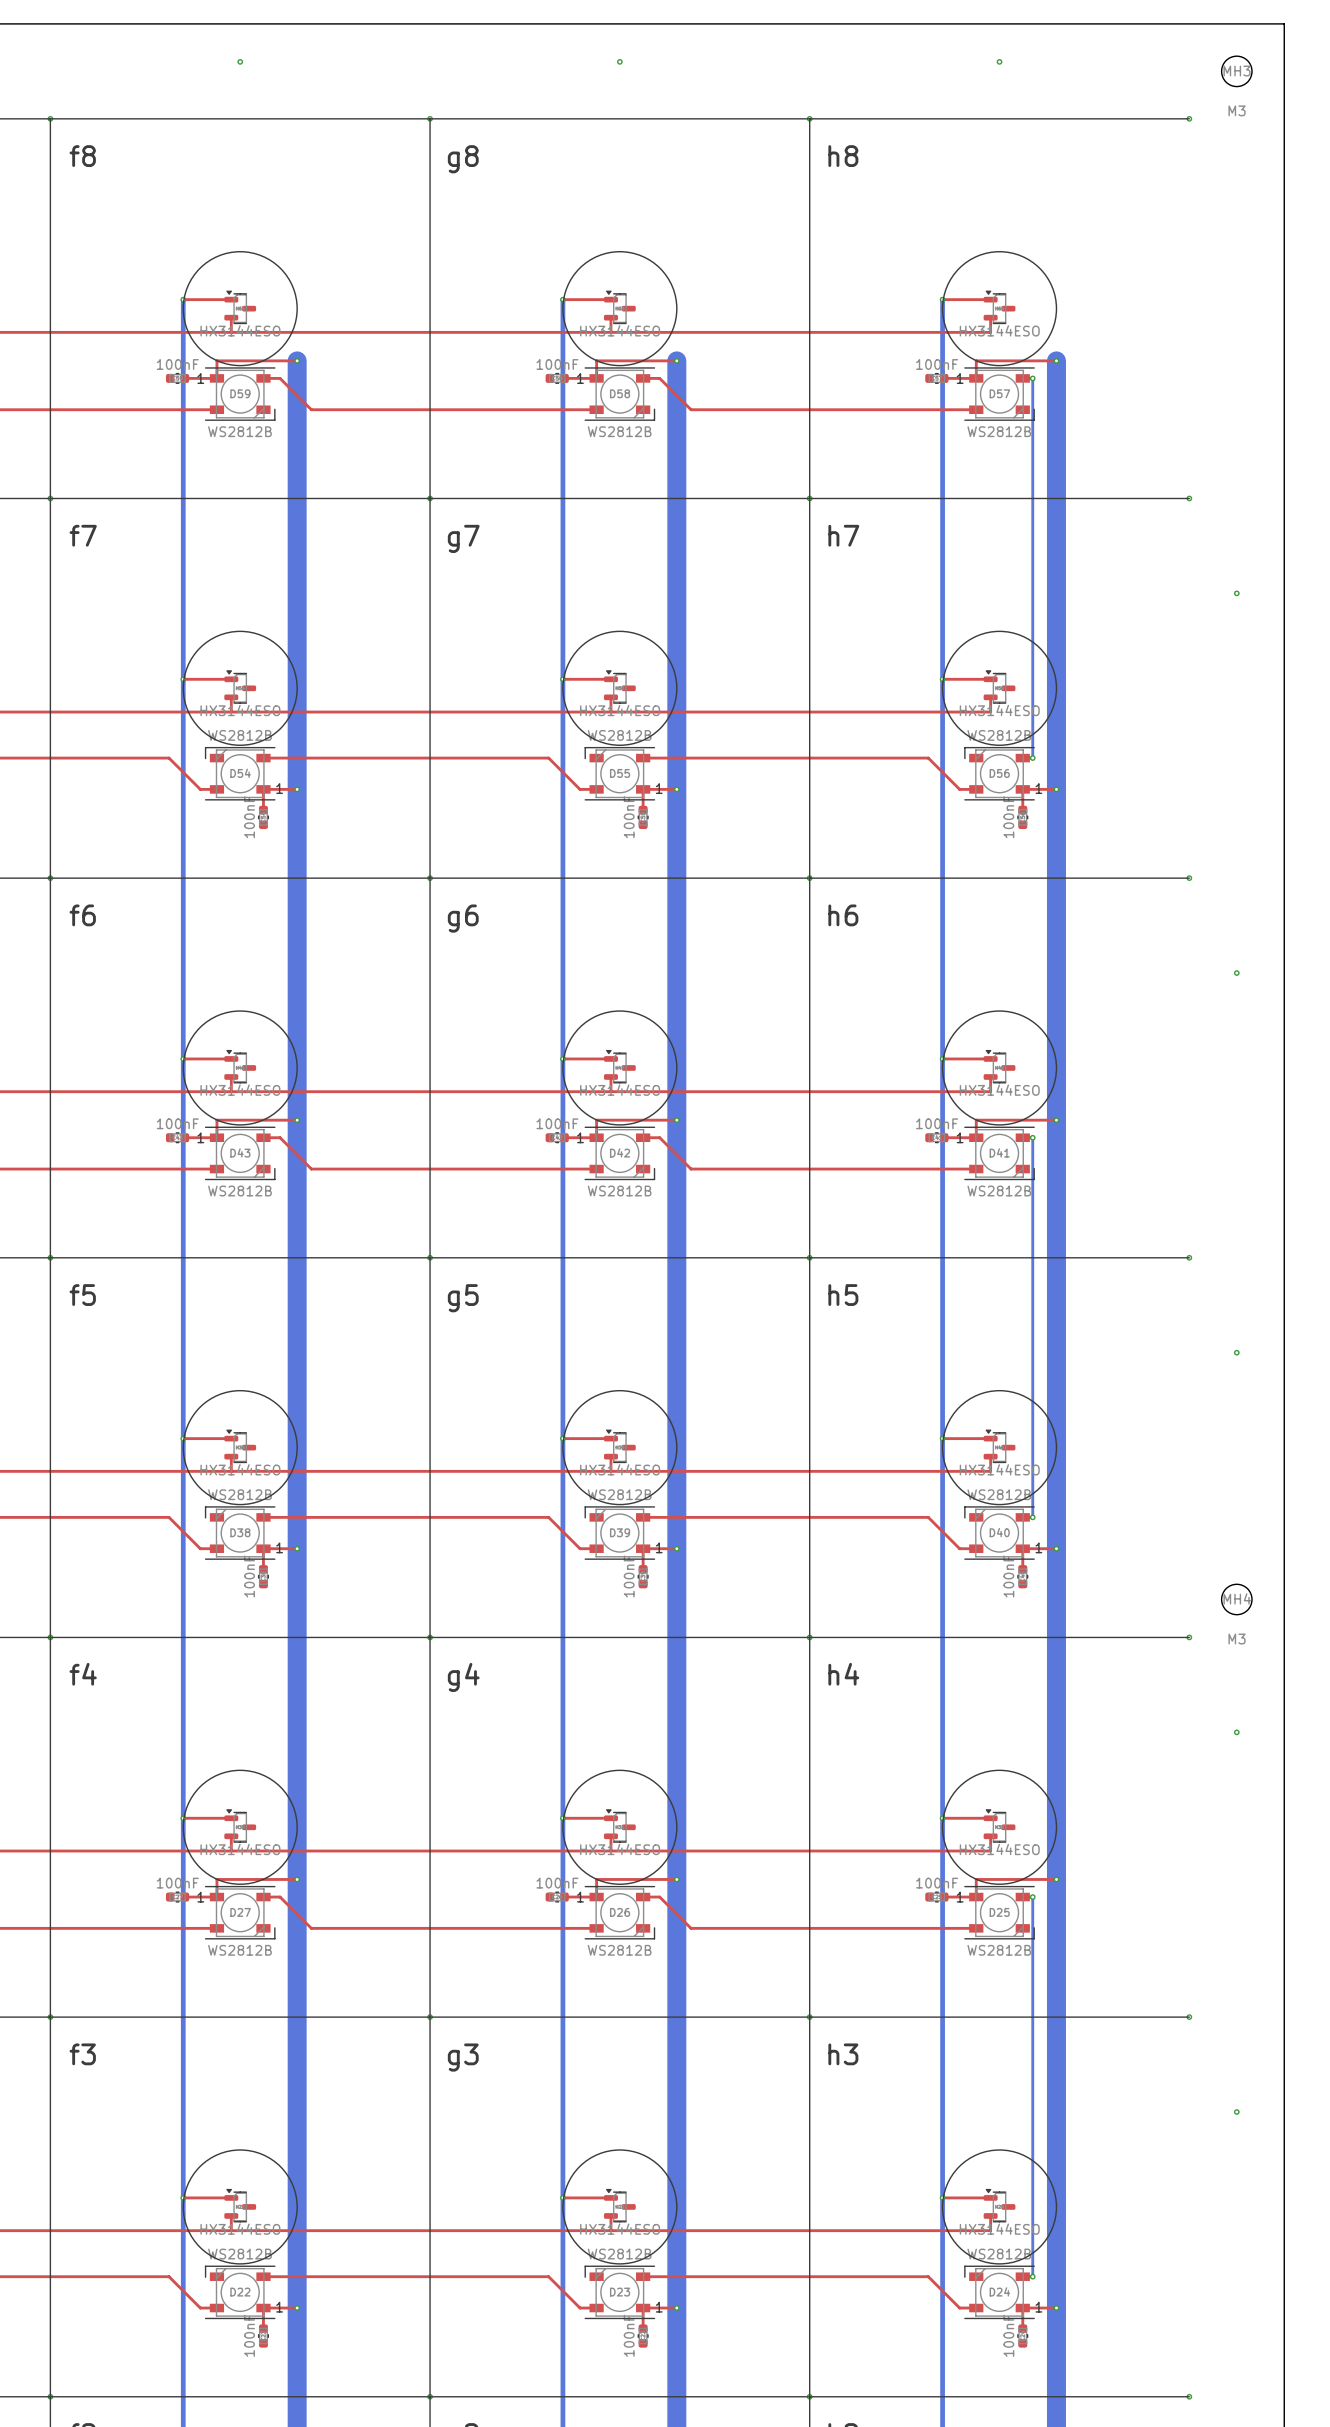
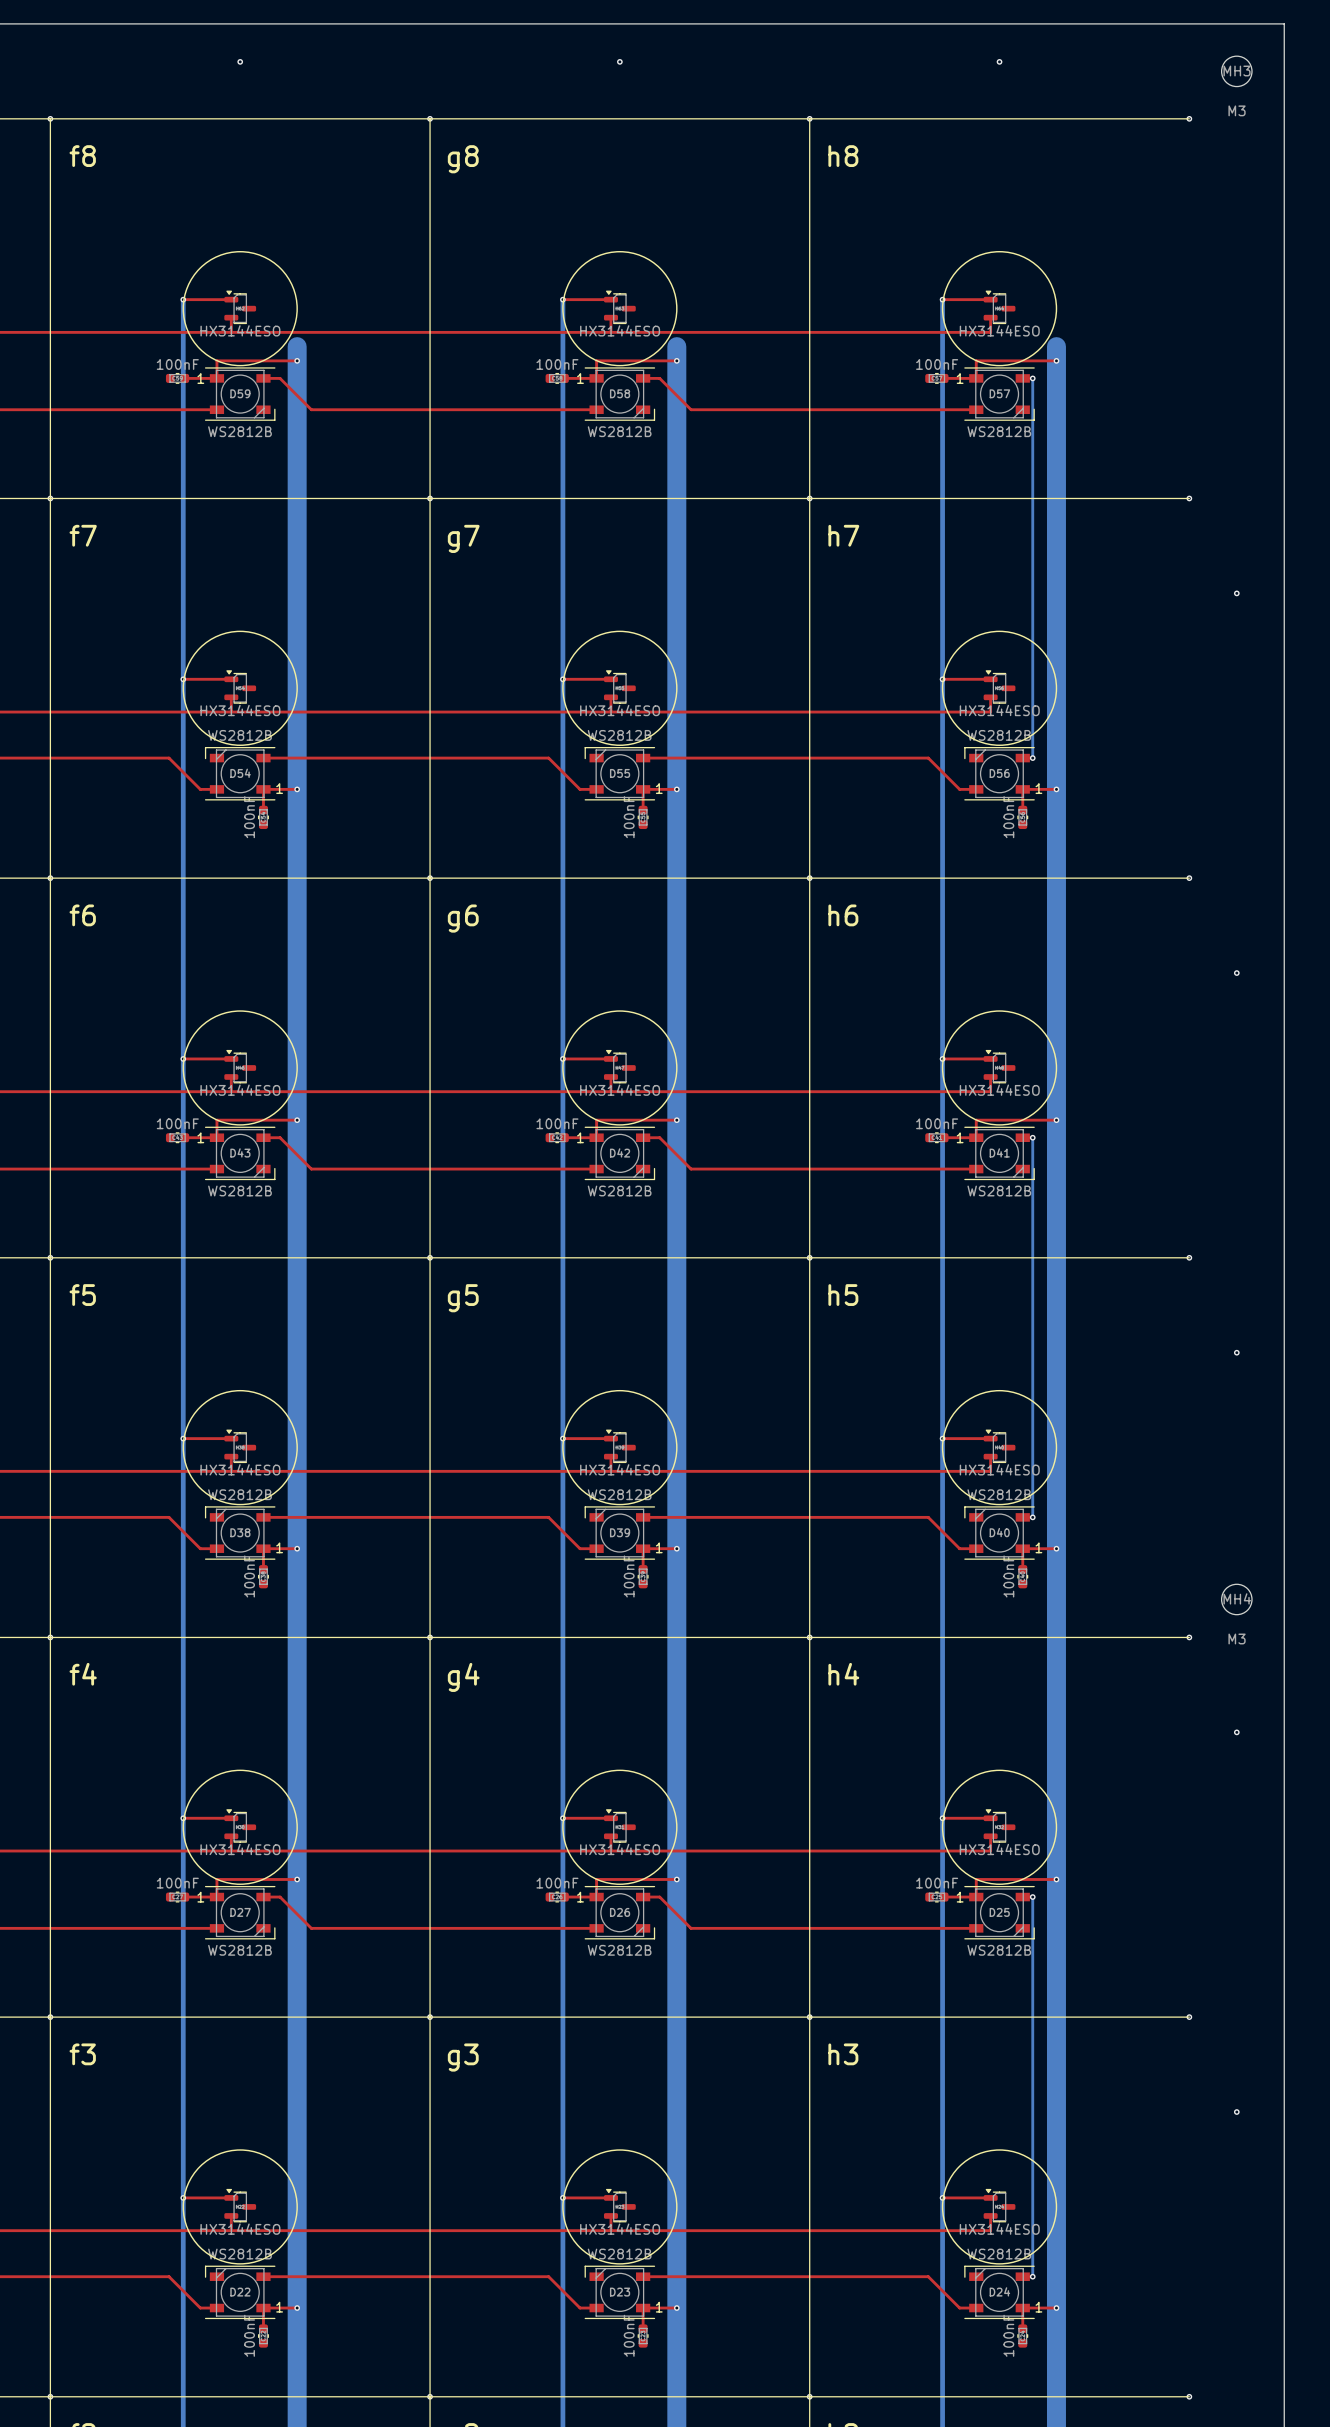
bottom track: none -> (297, 346) (297, 360)
bottom track: none -> (676, 346) (676, 360)
bottom track: none -> (1056, 346) (1056, 360)

